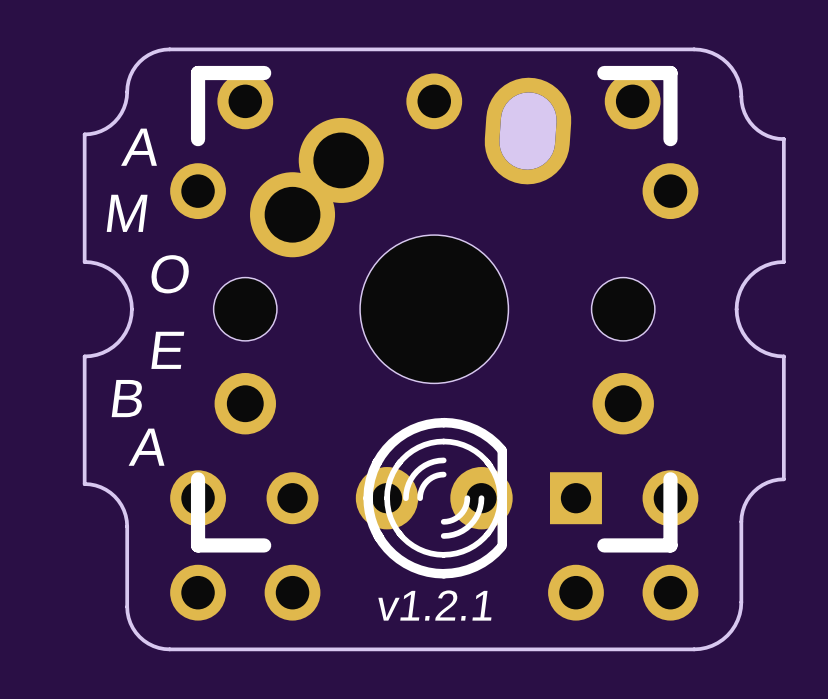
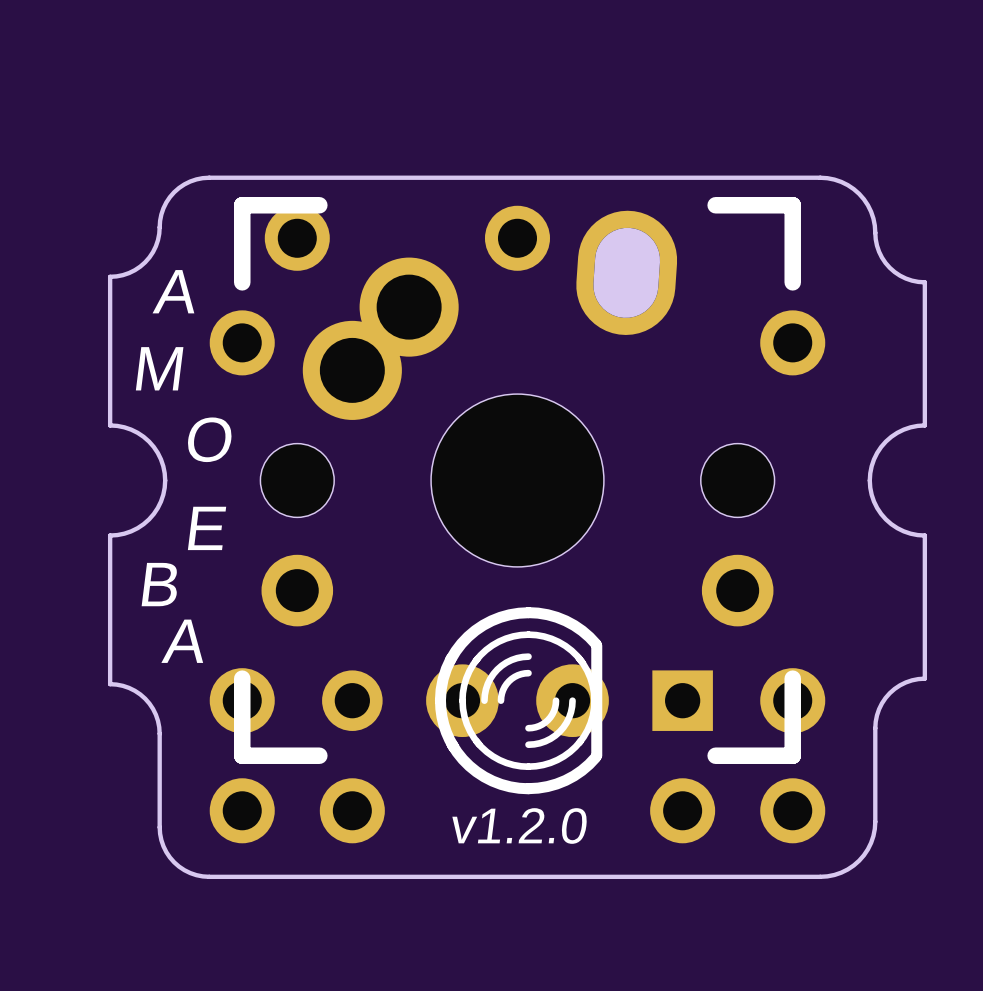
part: (632, 101) -> none
text: v1.2.1 (434, 605) -> v1.2.0 (519, 825)

